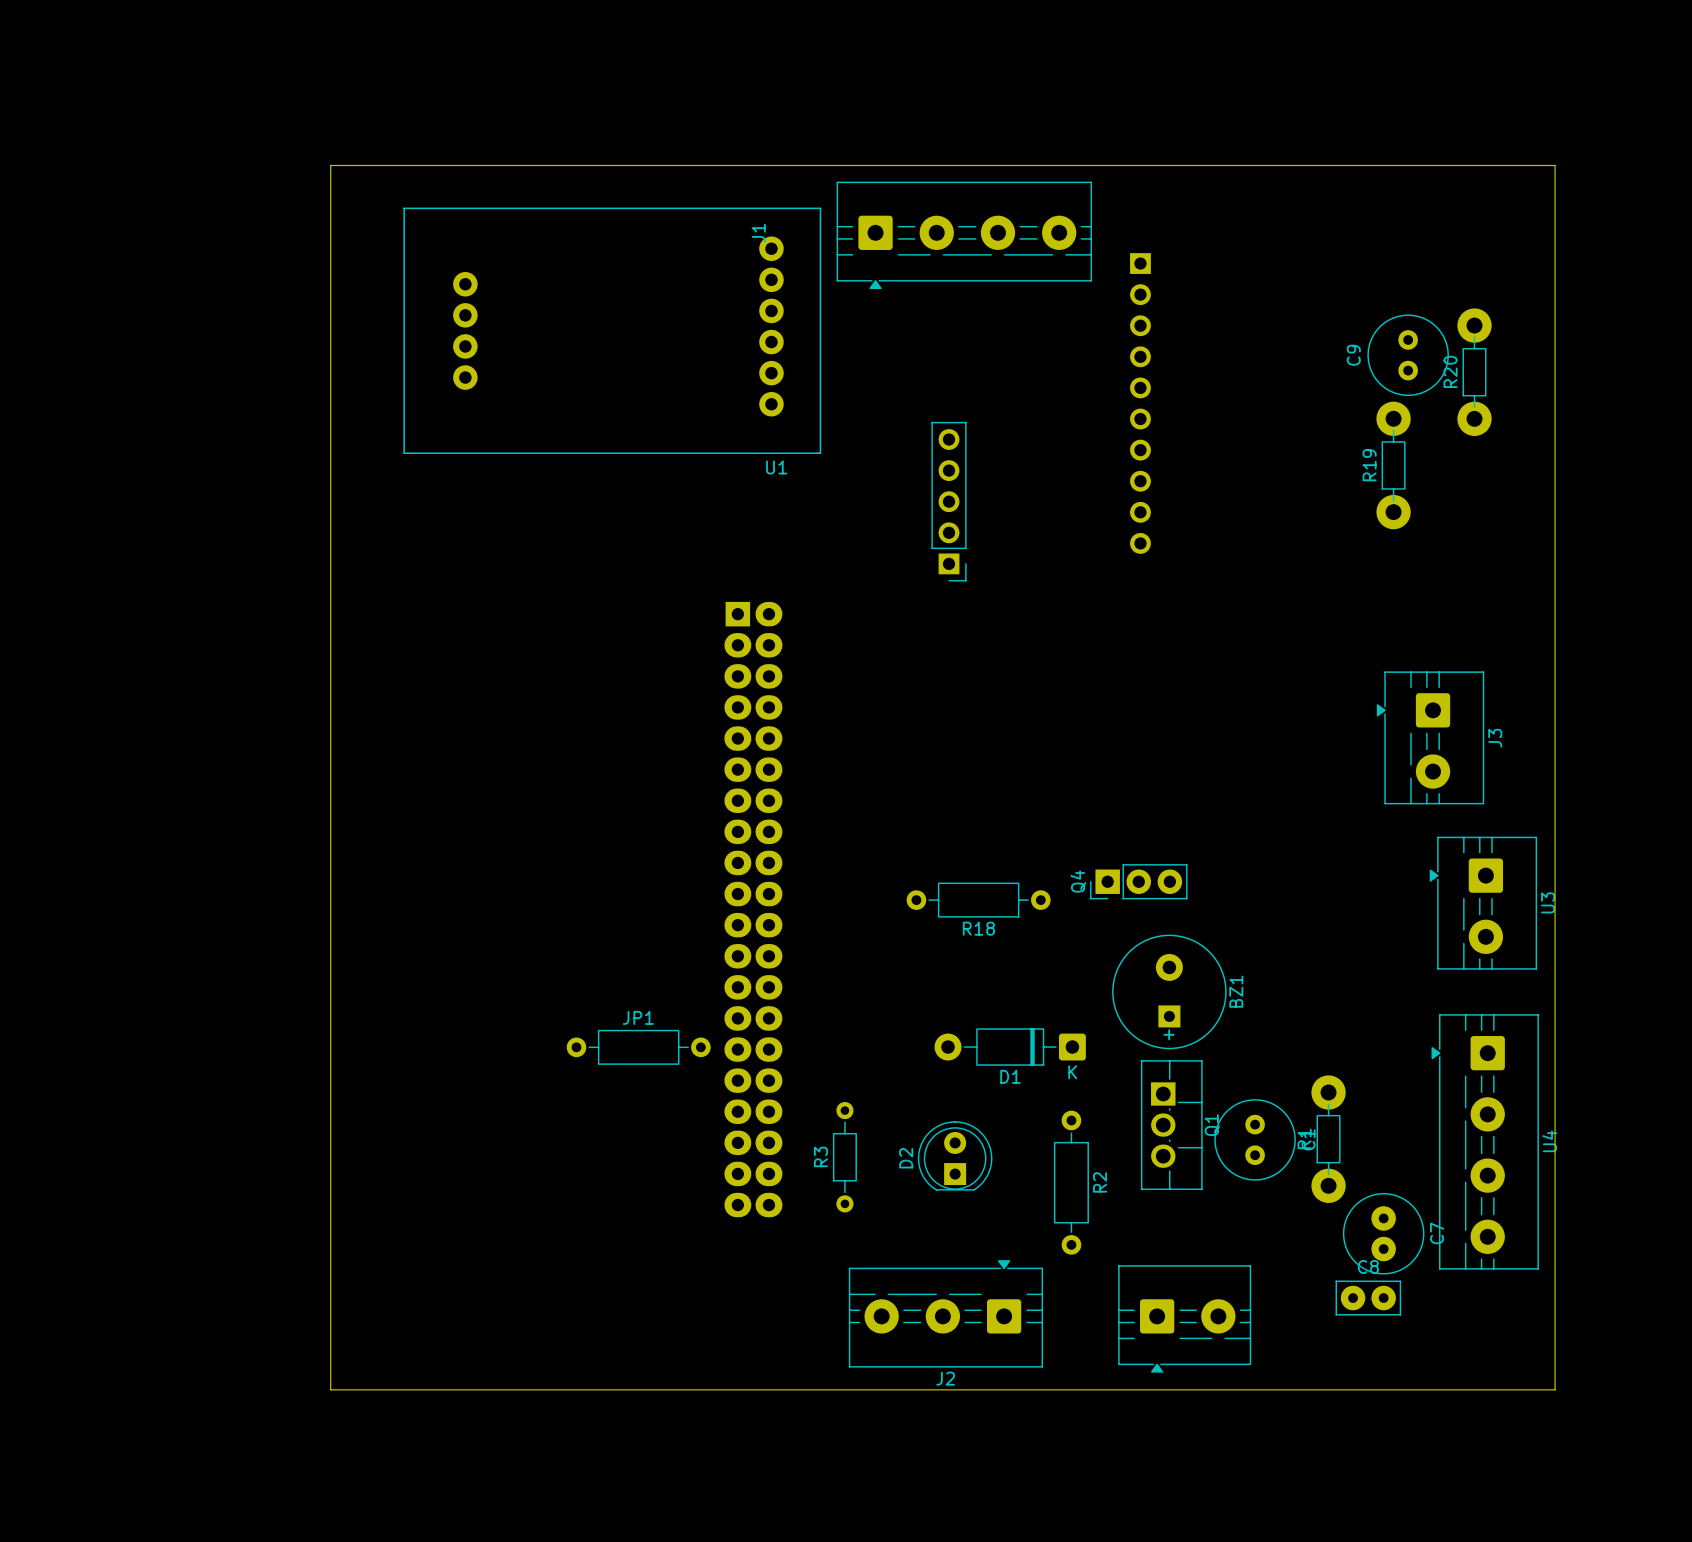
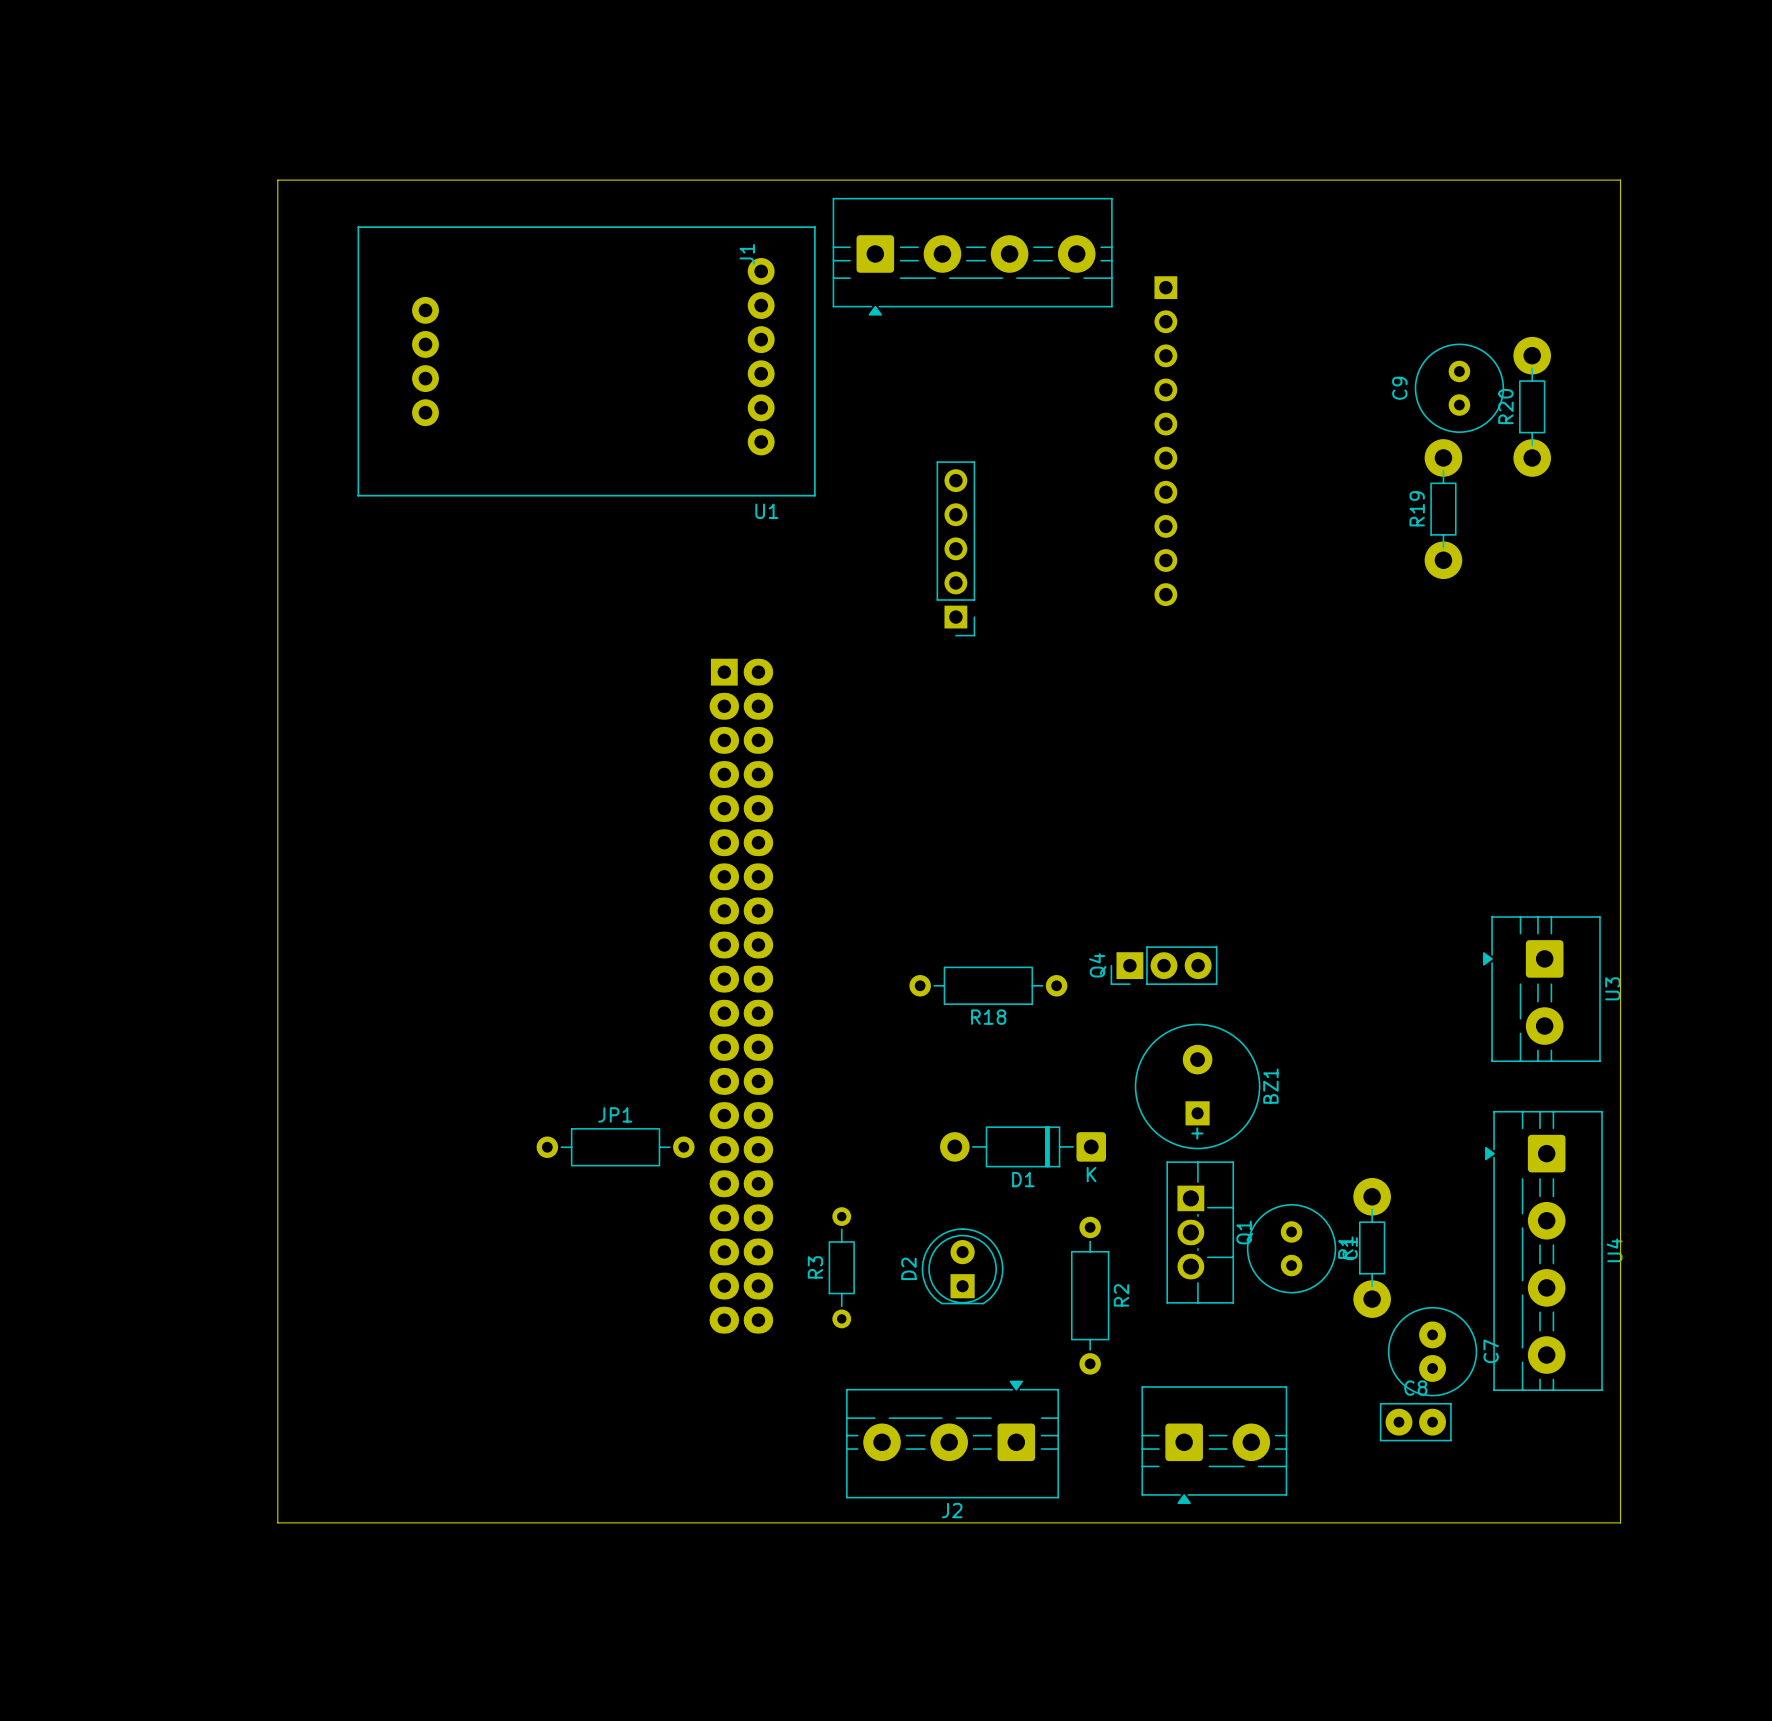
J3: (1430, 737) -> none

